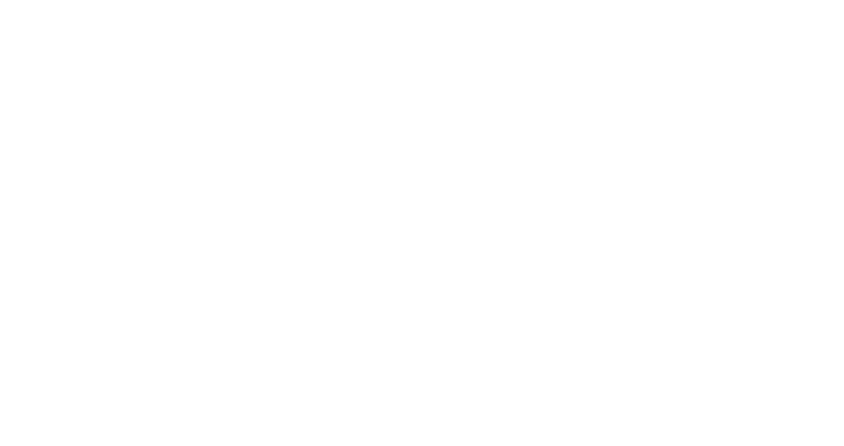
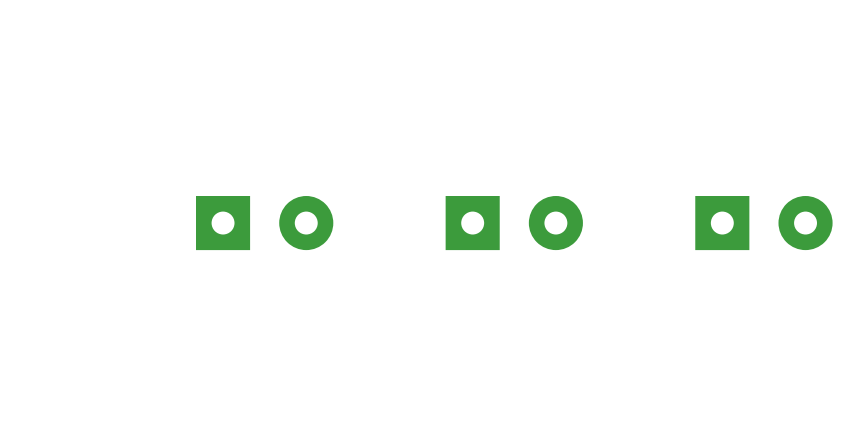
part: none -> (264, 223)
part: none -> (514, 223)
part: none -> (763, 223)

